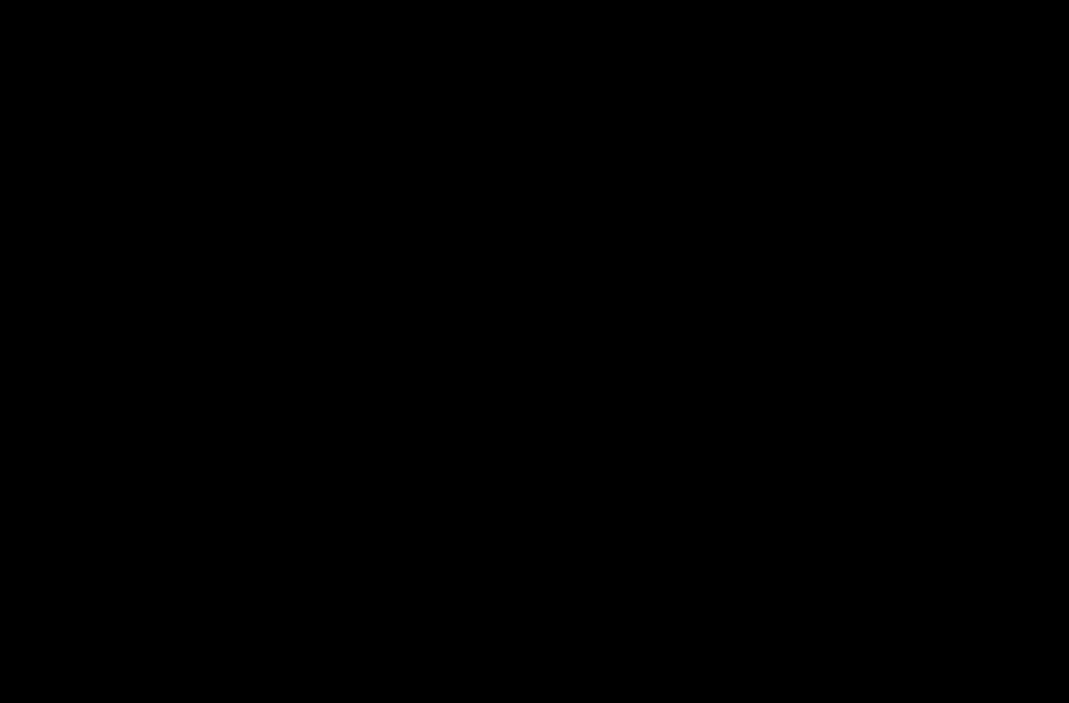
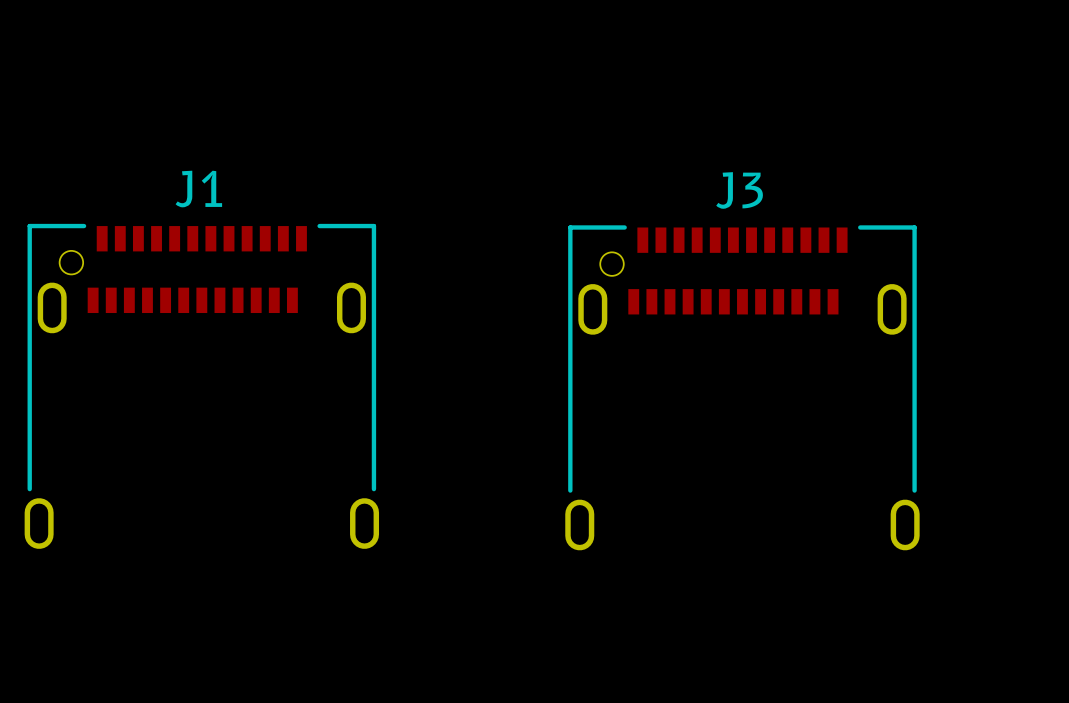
J1: none -> (201, 386)
J3: none -> (742, 387)

